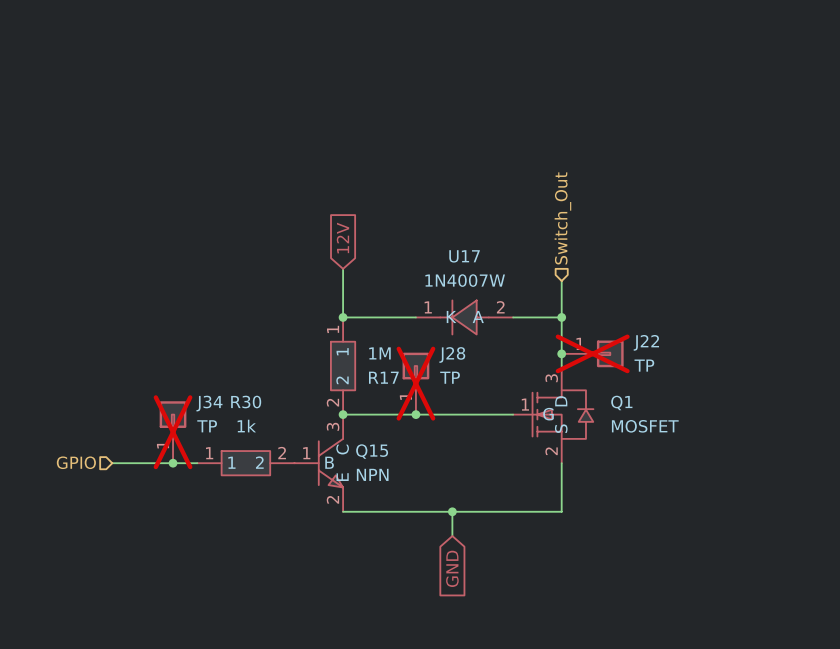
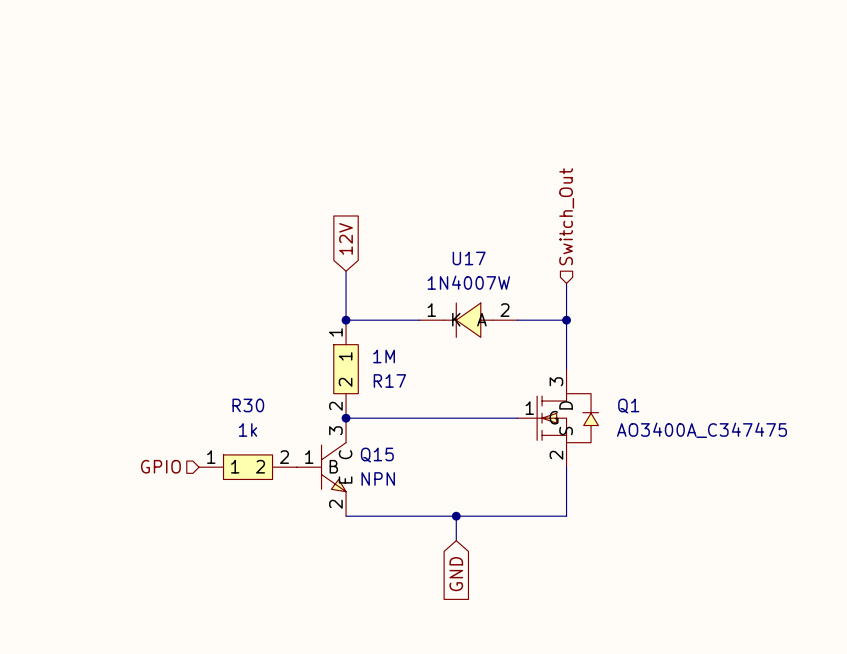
junction: (561, 353) -> none
J22: TP (592, 353) -> none
J28: TP (415, 383) -> none
junction: (415, 414) -> none
Q1 value: MOSFET (645, 426) -> AO3400A_C347475 (701, 430)
J34: TP (173, 432) -> none
hierarchical label position: GPIO (76, 462) -> GPIO (160, 466)
wire: (112, 463) (197, 463) -> none
junction: (173, 463) -> none

